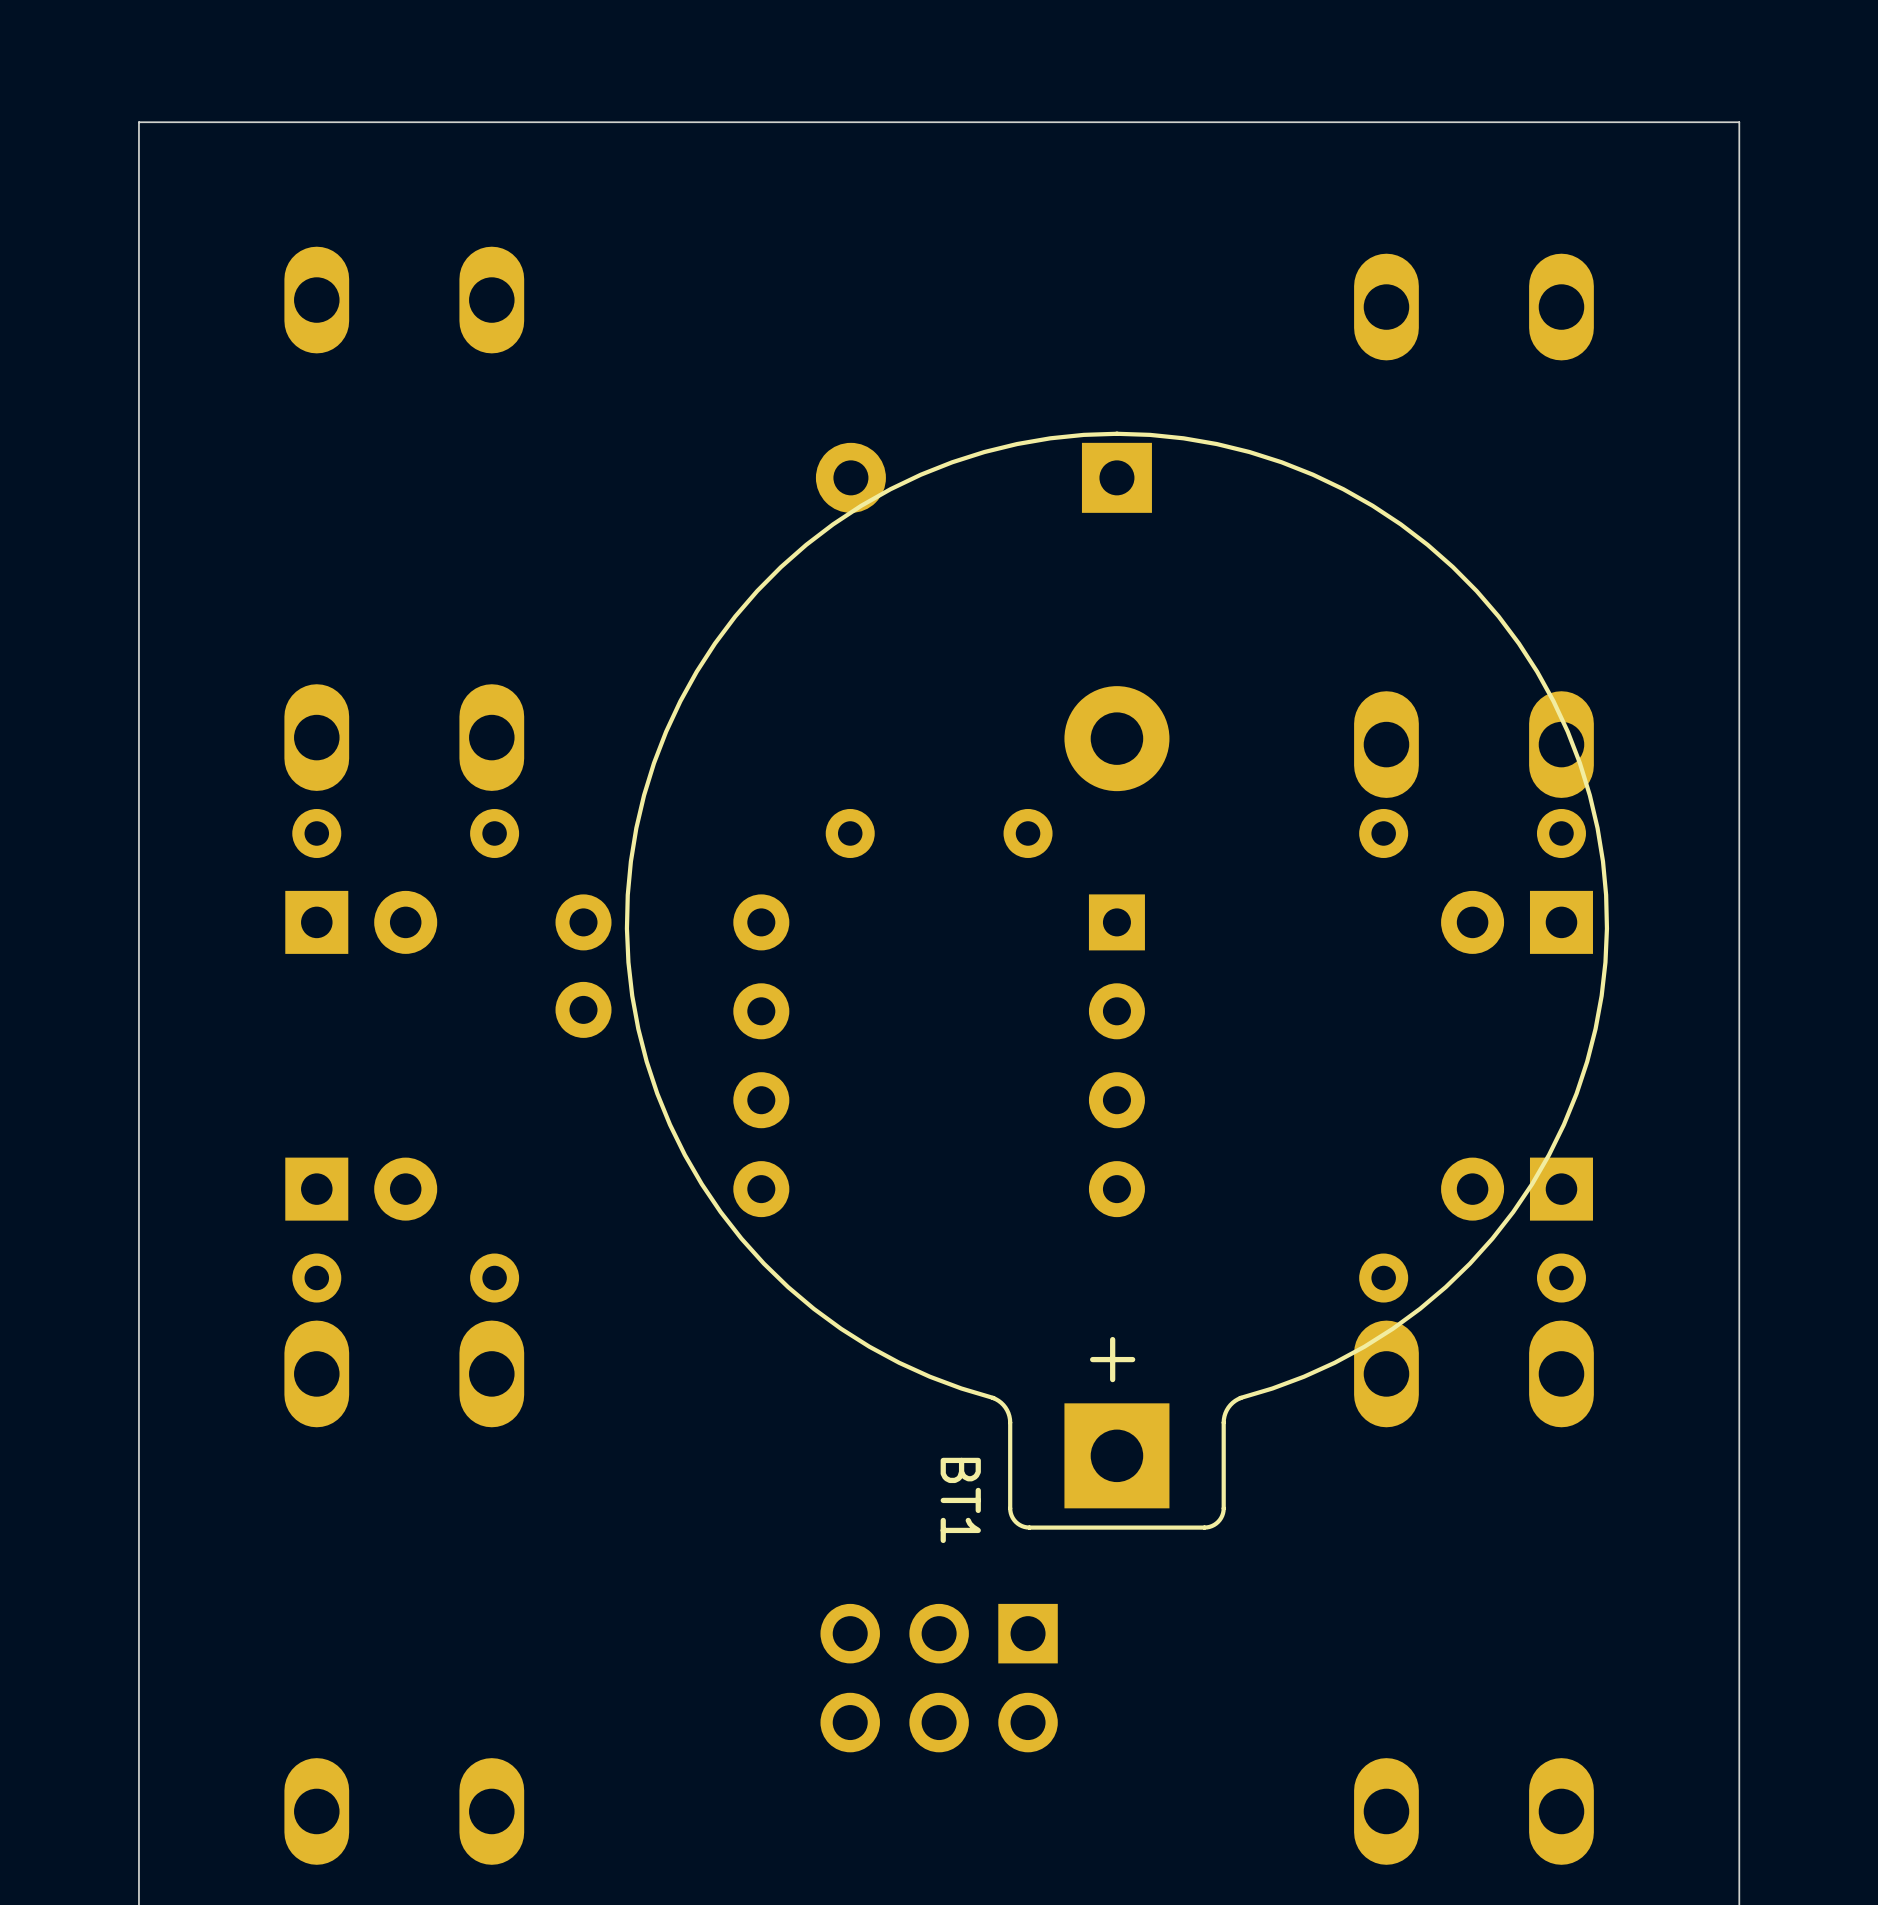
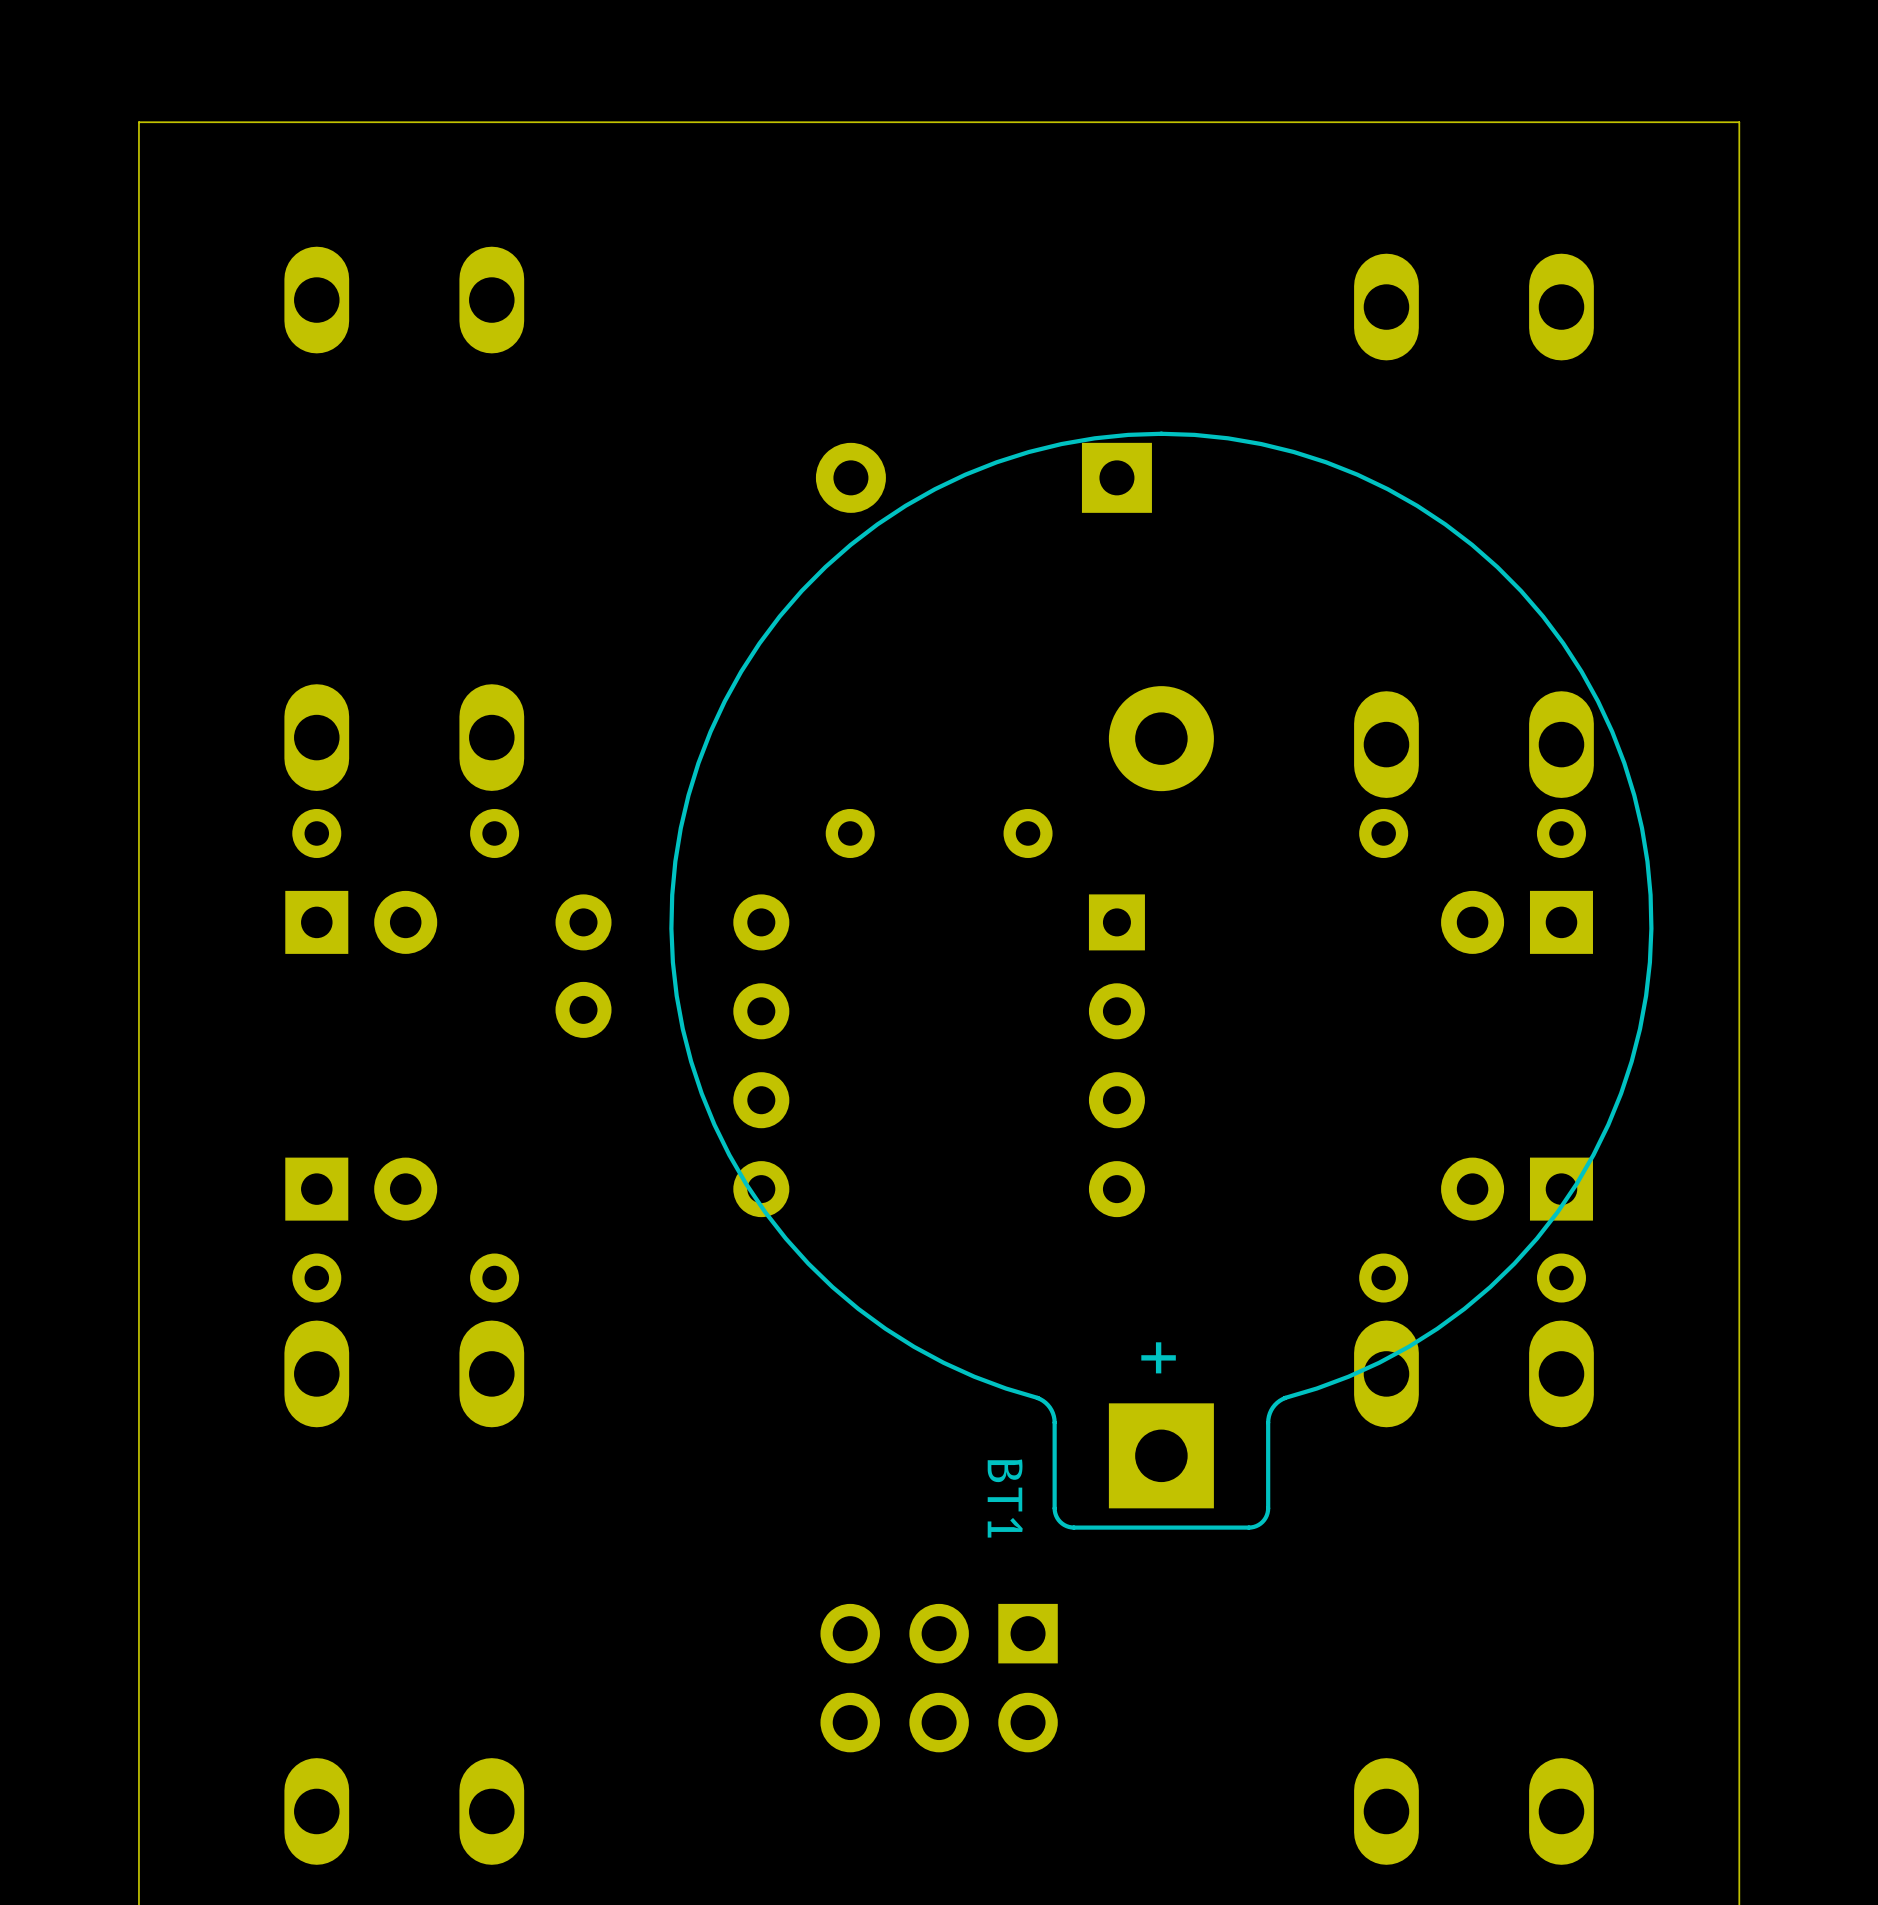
BT1 position: (1116, 980) -> (1161, 980)

